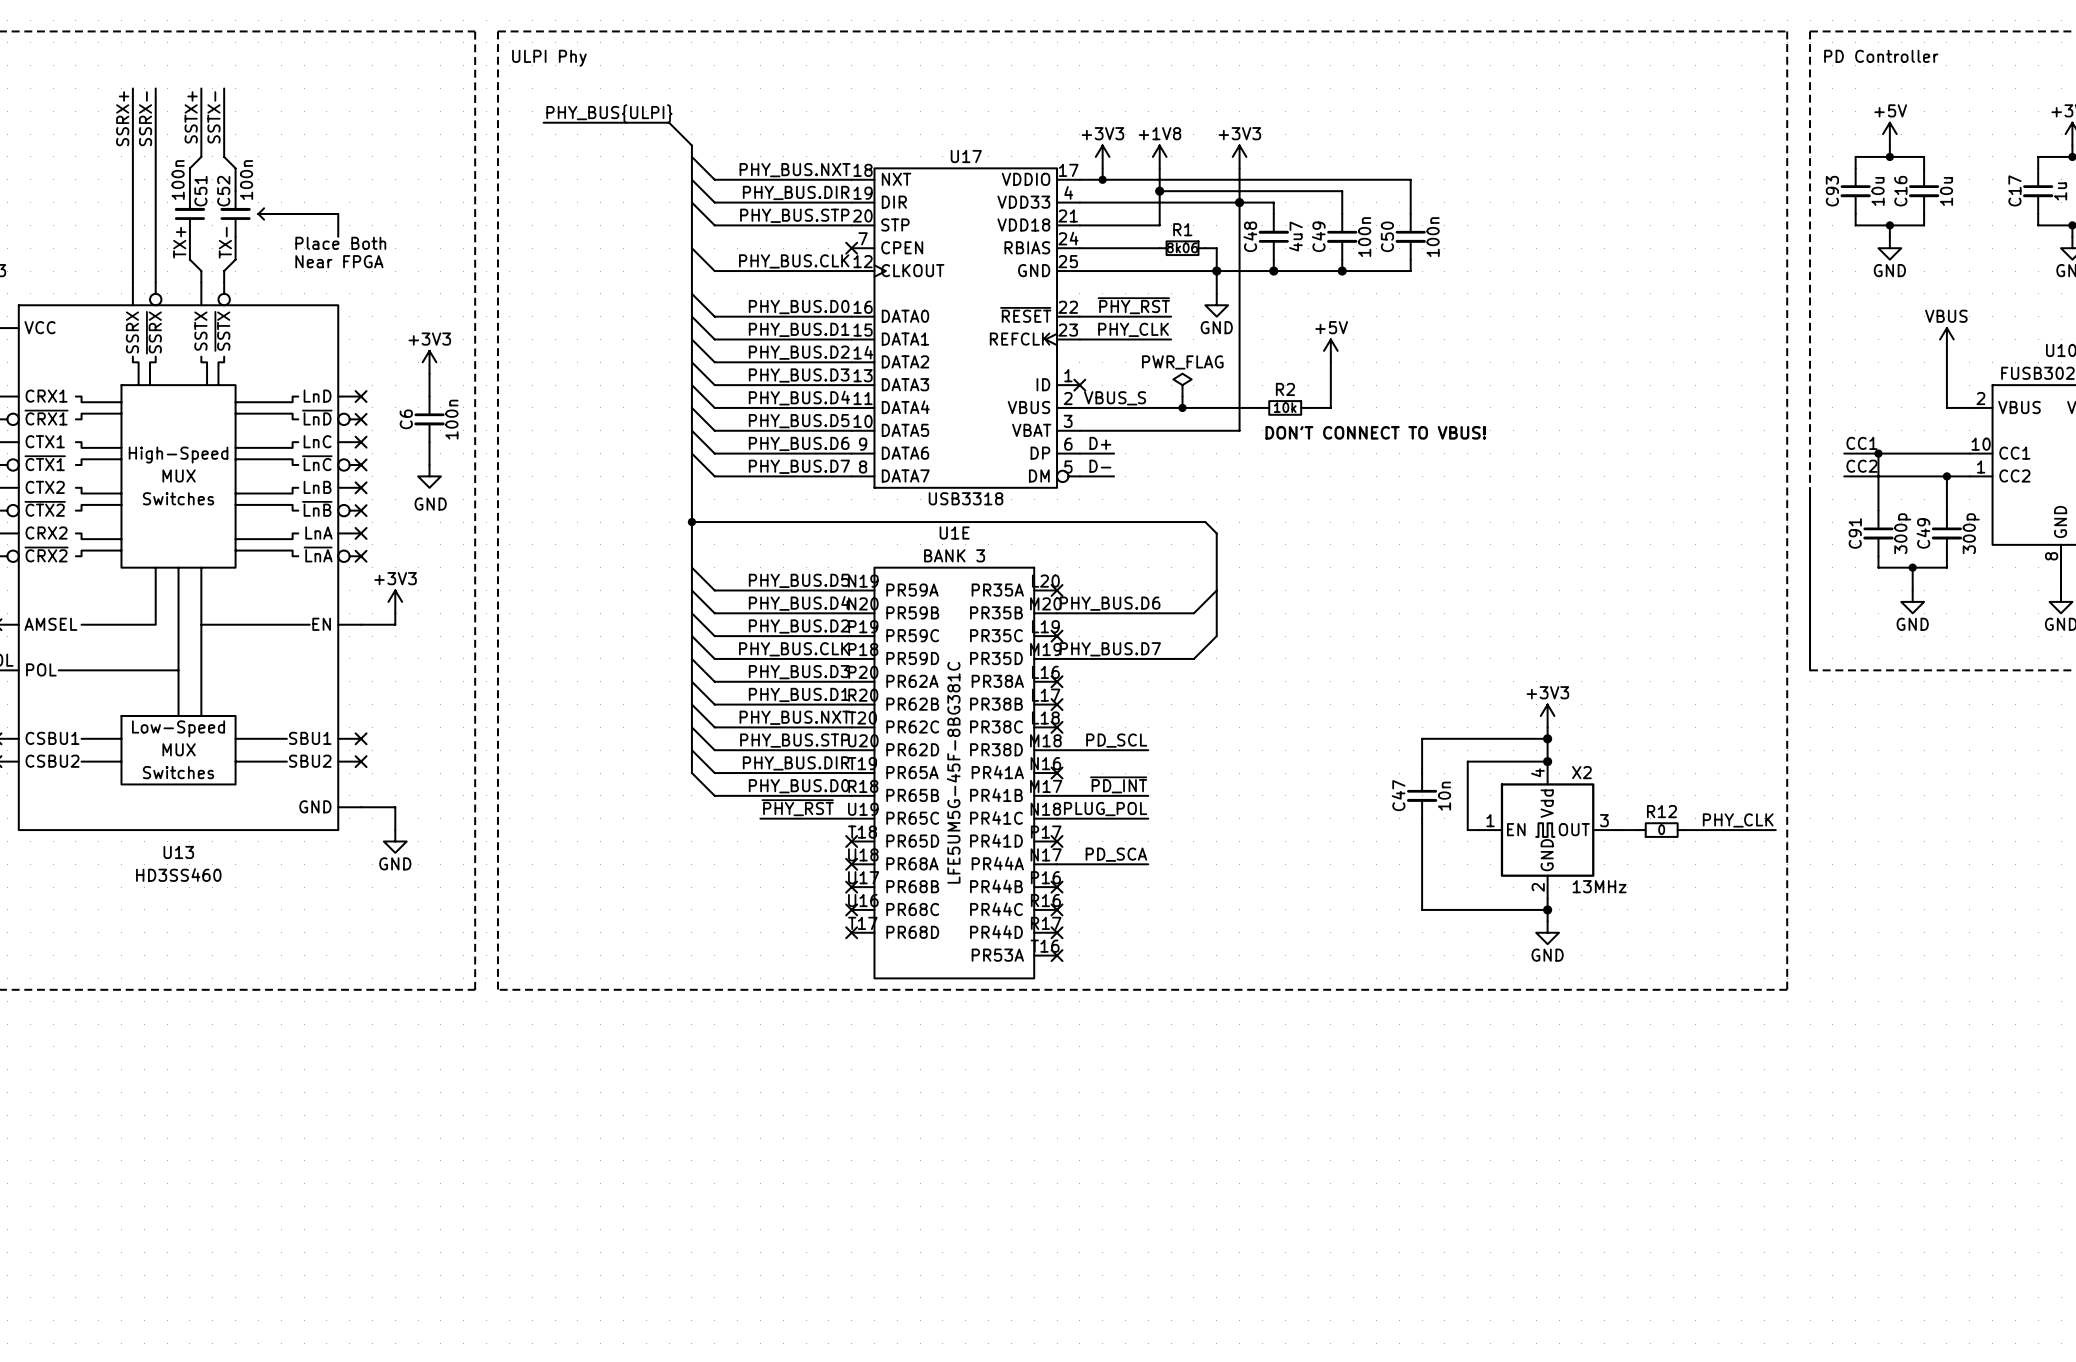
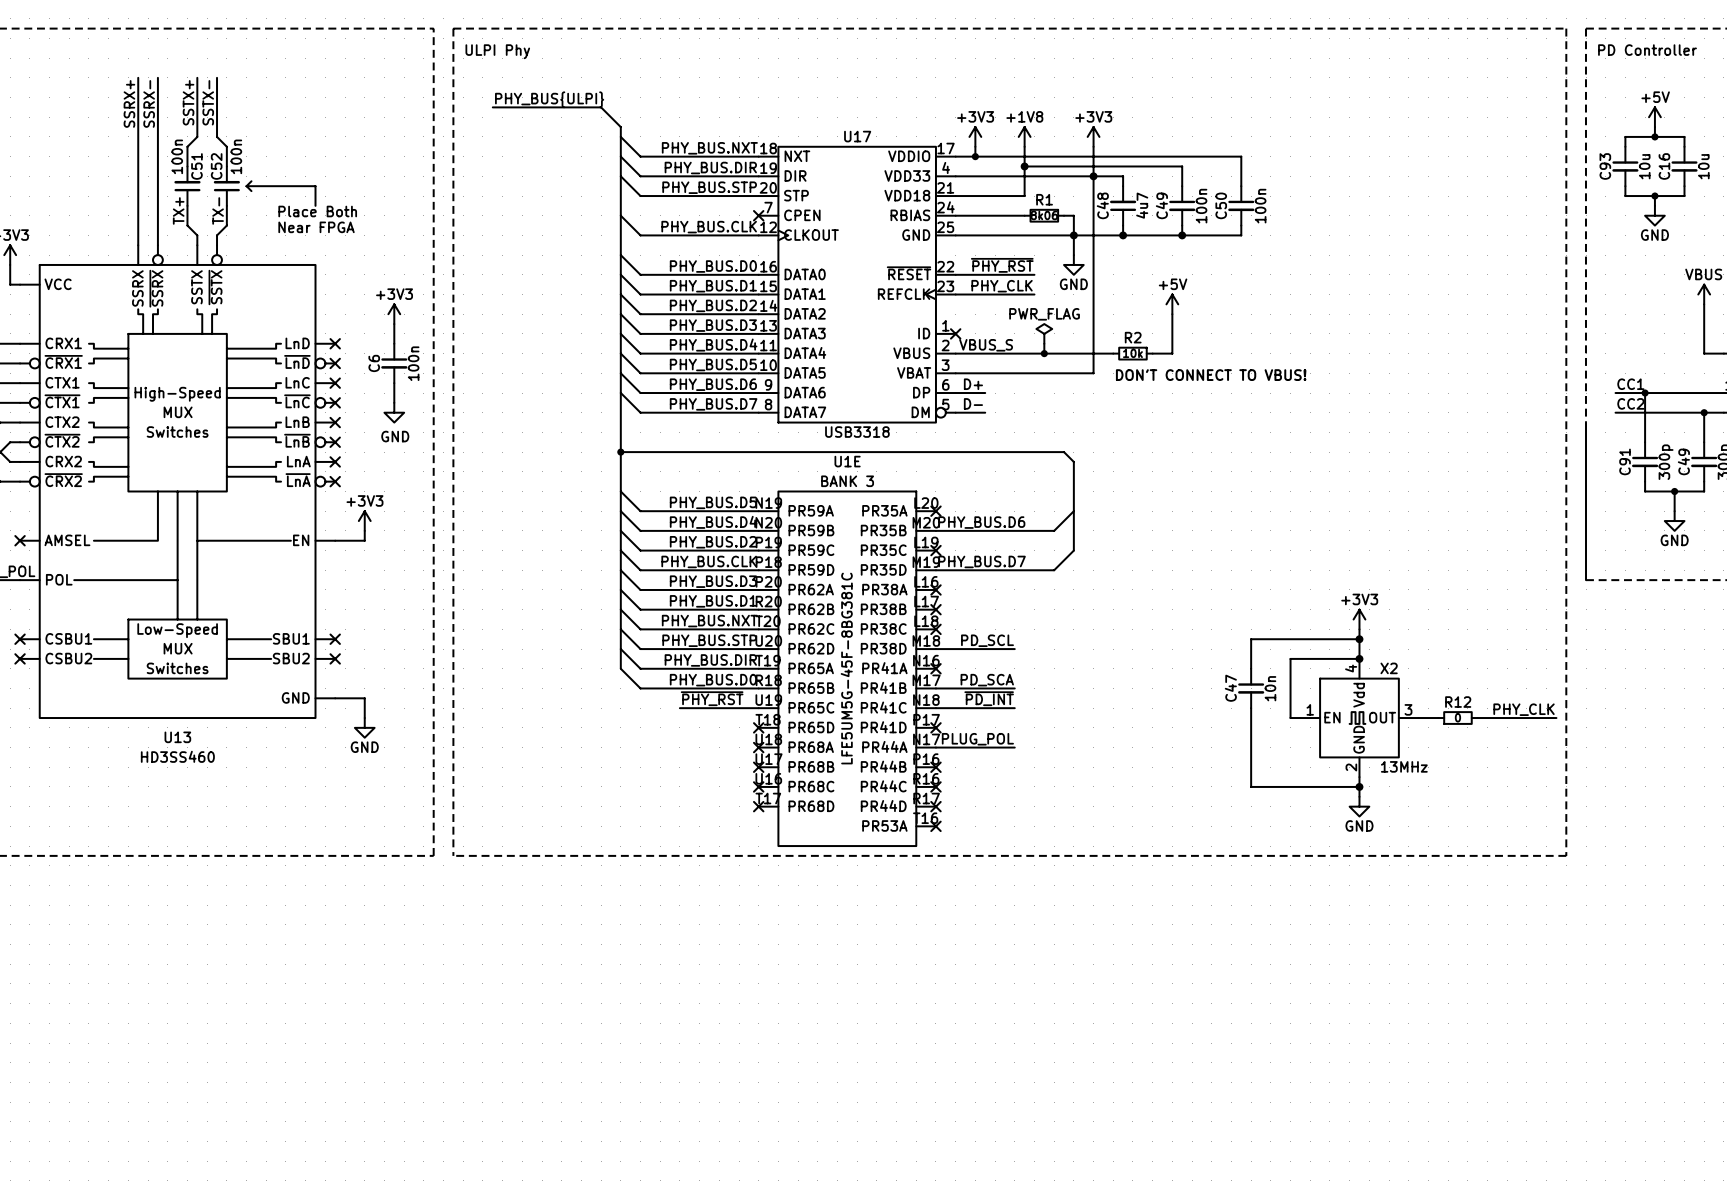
label: ~{PD_INT} (1118, 784) -> PD_SCA (987, 680)
label: PLUG_POL (1105, 809) -> ~{PD_INT} (989, 698)
label: PD_SCA (1116, 854) -> PLUG_POL (977, 739)

